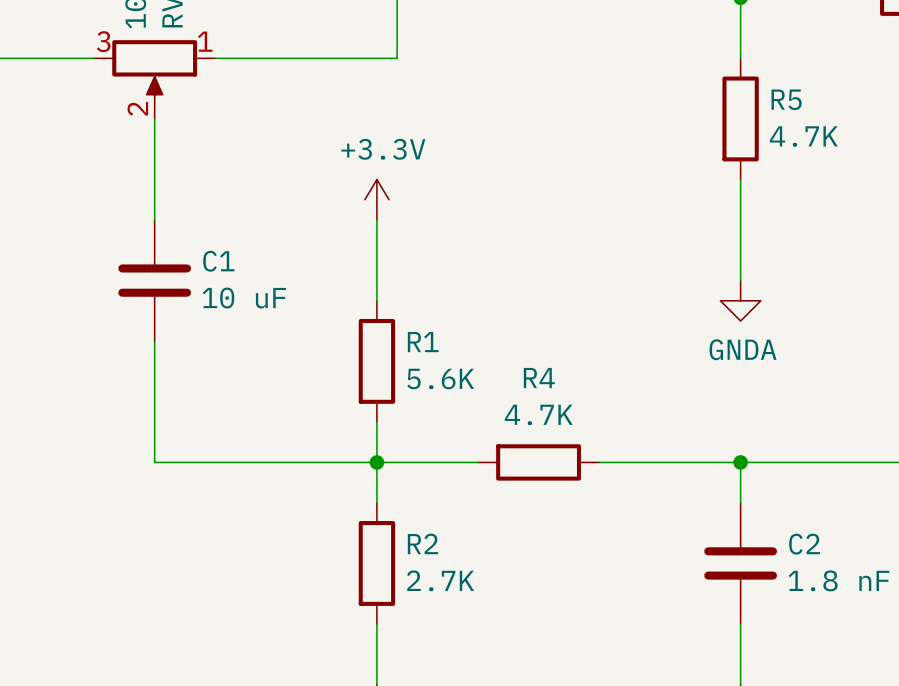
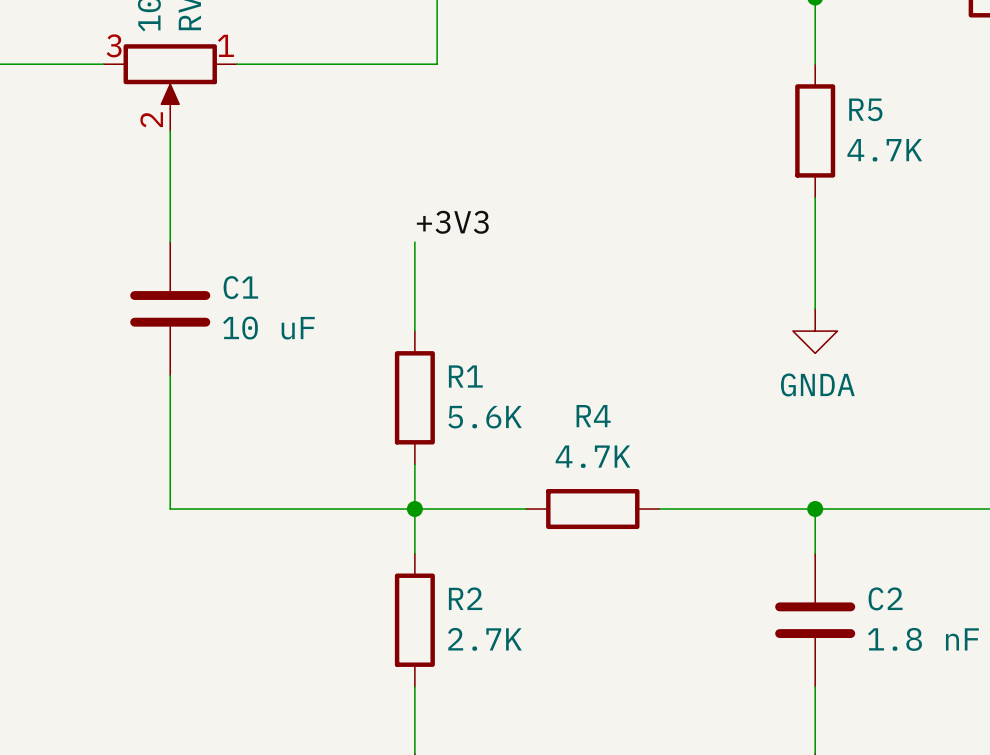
power symbol: +3.3V (376, 199) -> none
label: none -> +3V3 (452, 222)

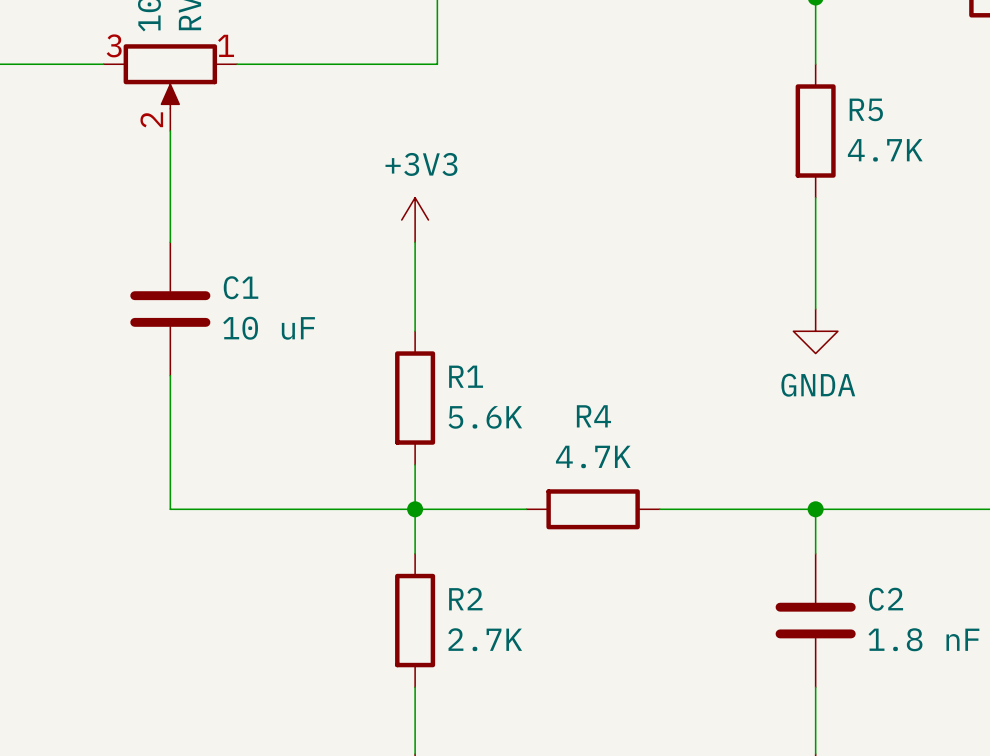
power symbol: none -> +3V3 (415, 220)
label: +3V3 (452, 222) -> none

